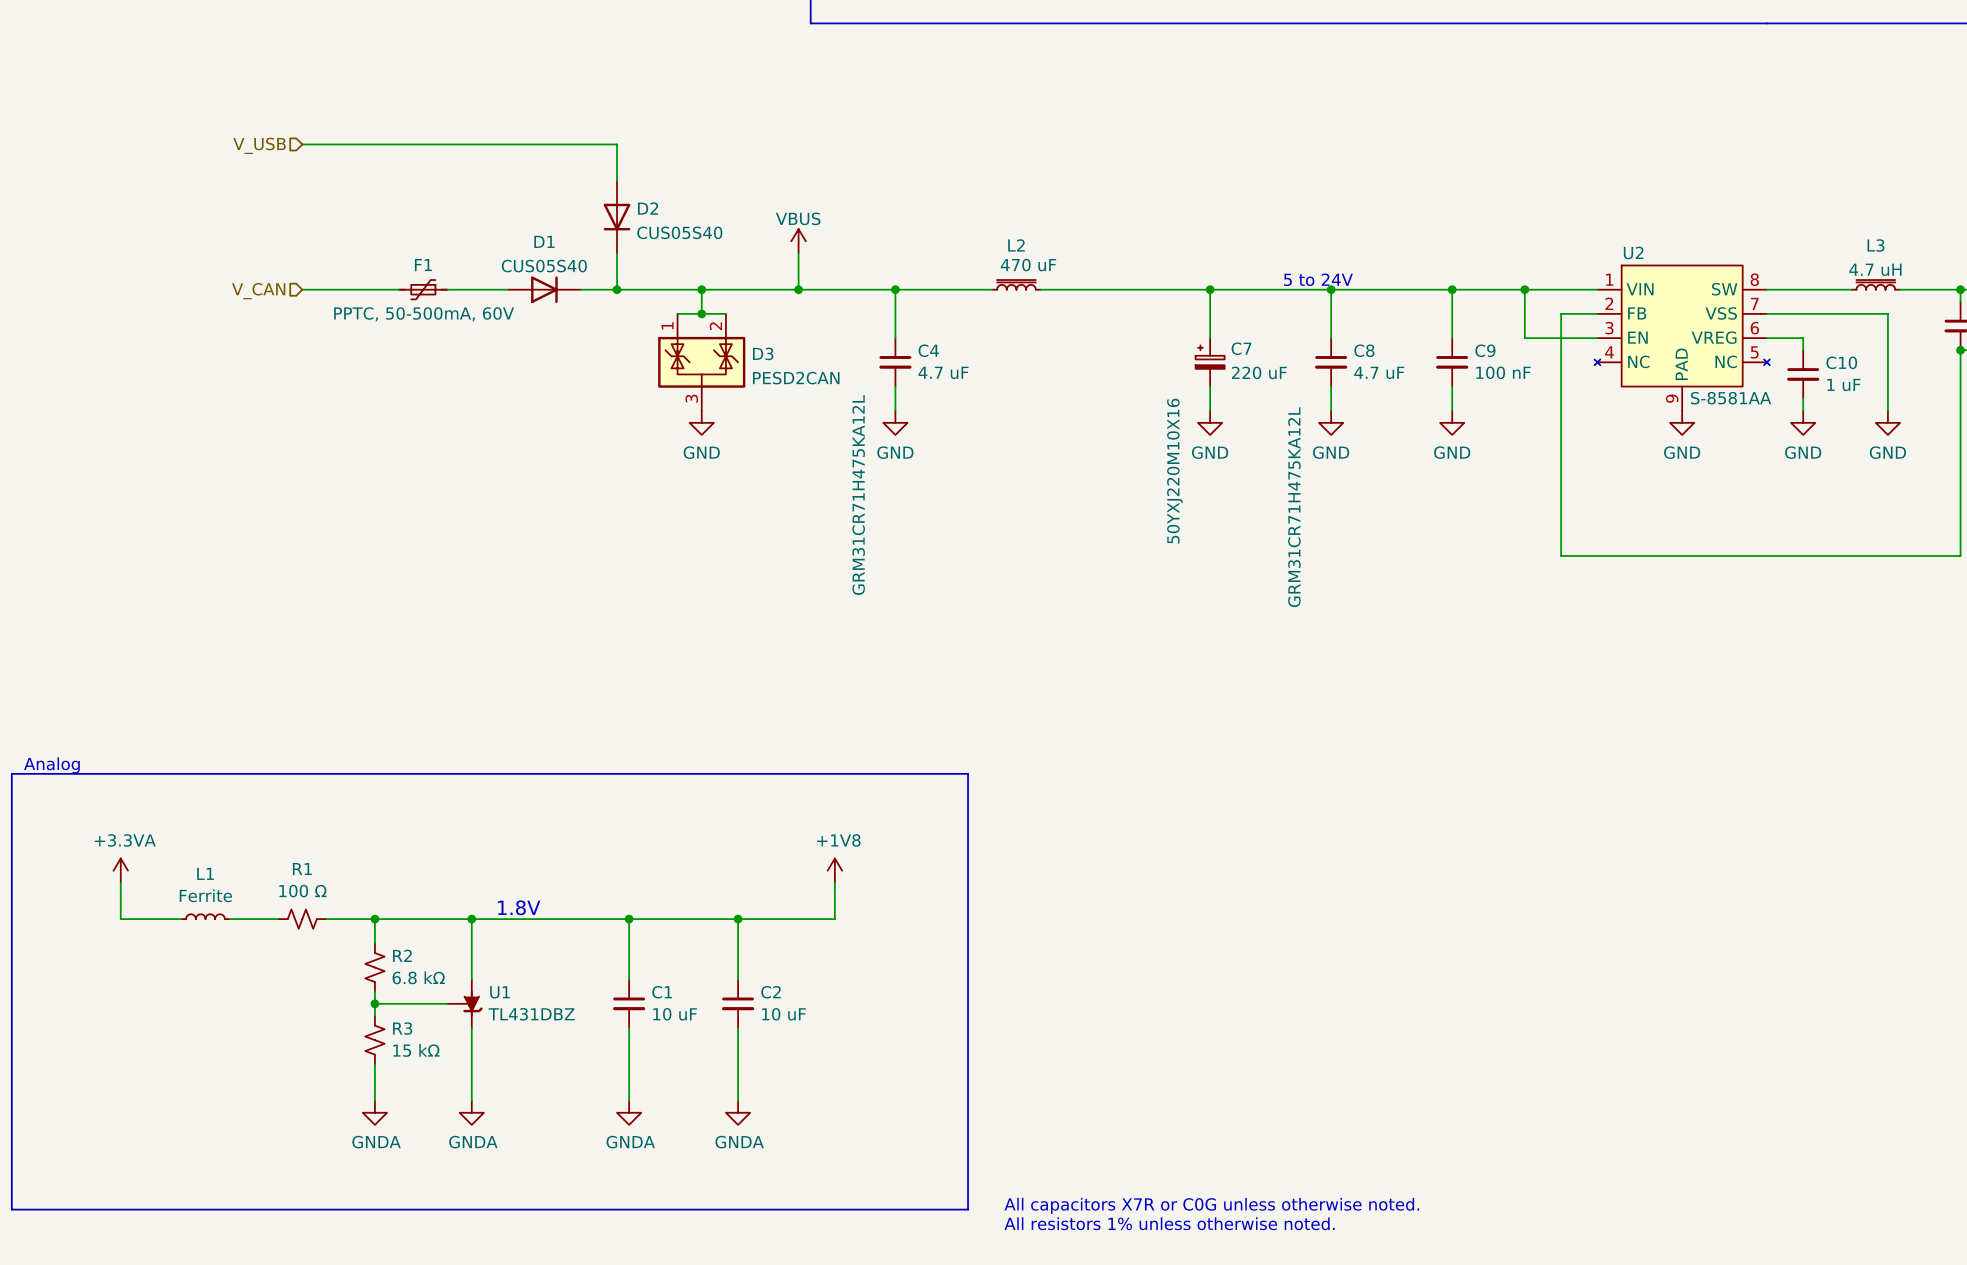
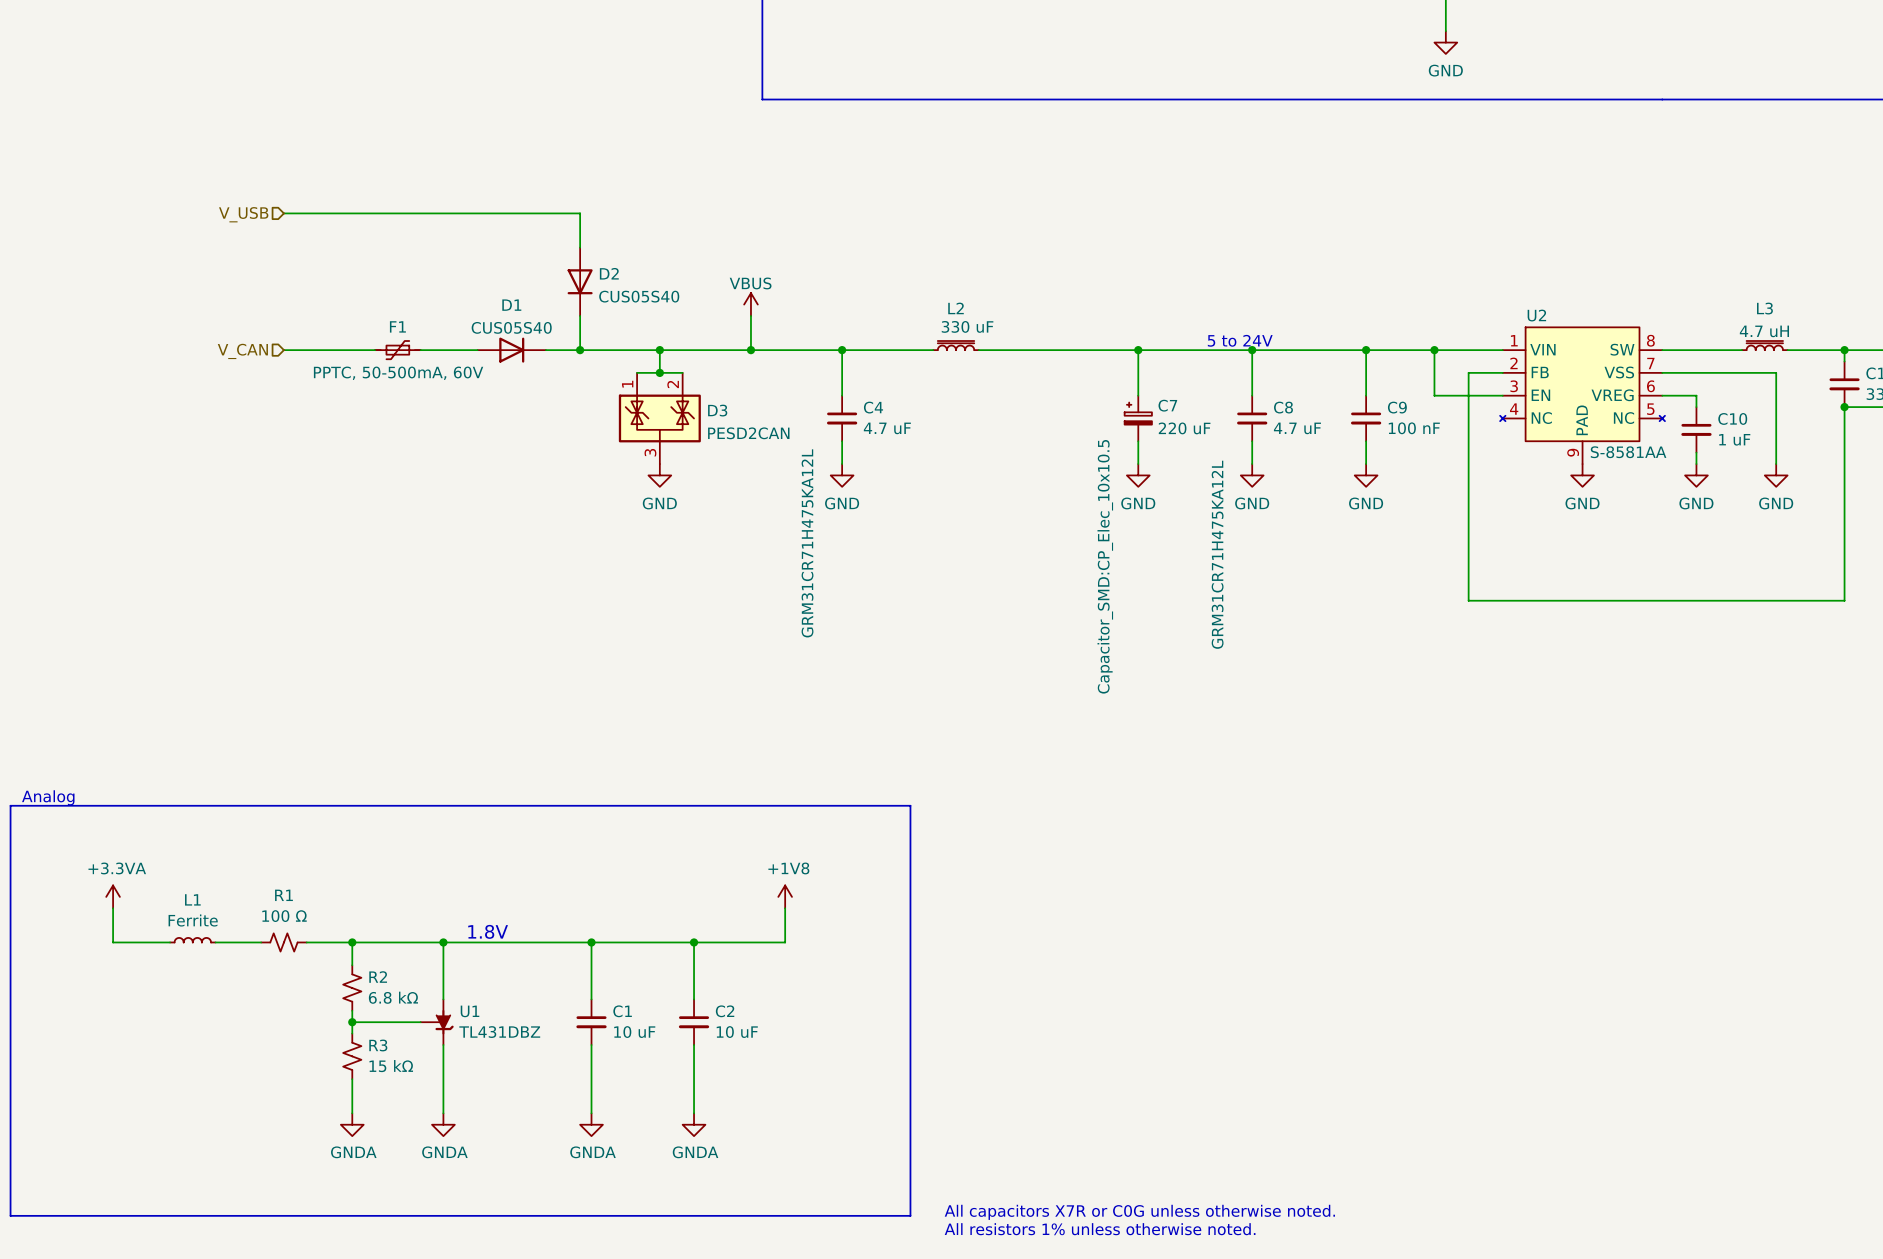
L2 value: 470 uF (1028, 265) -> 330 uF (967, 326)
C7 text: 50YXJ220M10X16 (1174, 471) -> none
C7 text: none -> Capacitor_SMD:CP_Elec_10x10.5 (1105, 566)

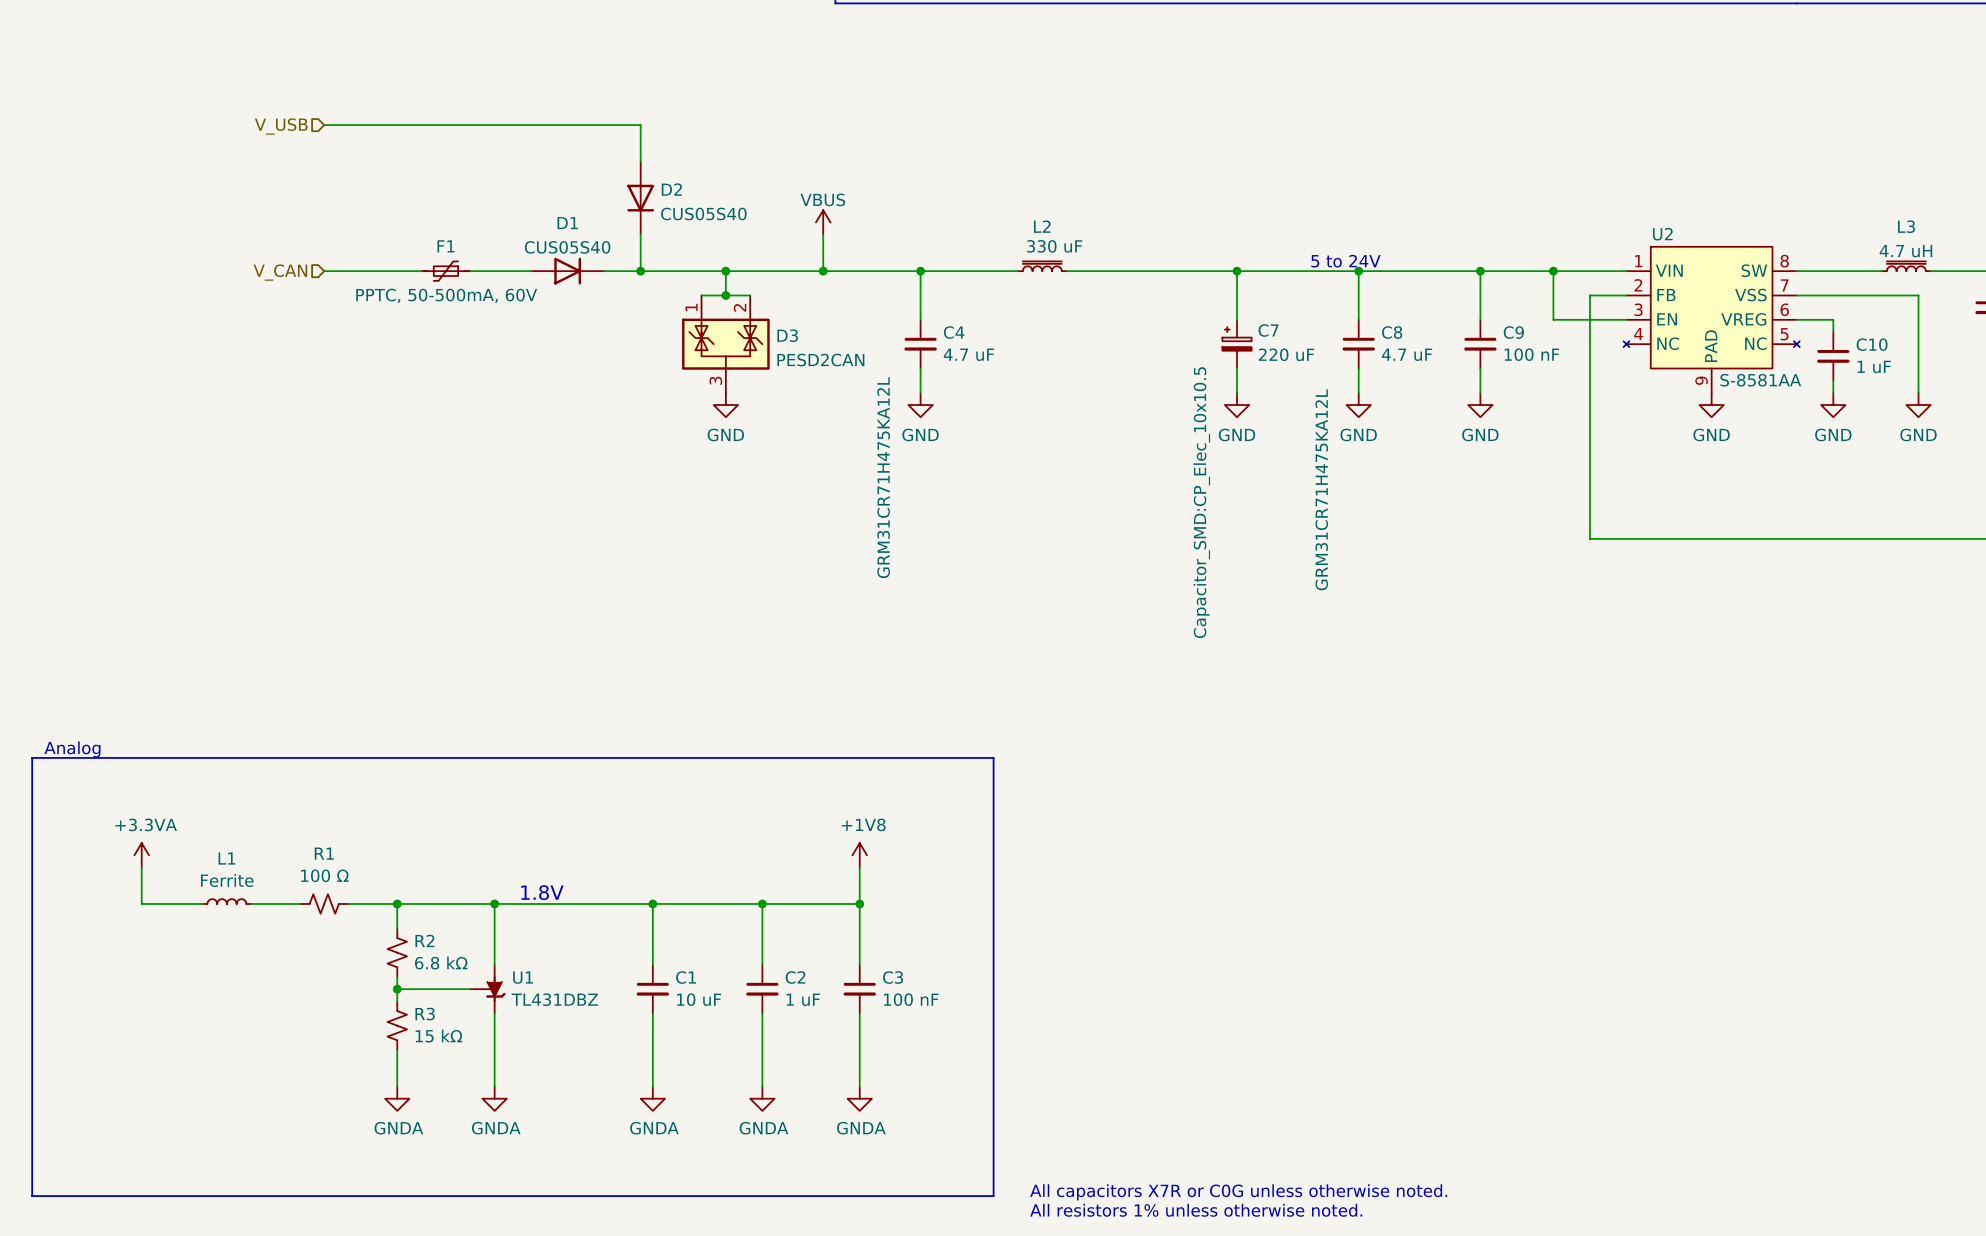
wire: none -> (859, 903) (859, 964)
junction: none -> (859, 903)
C3: none -> 100 nF (859, 989)
C2 value: 10 uF (737, 1032) -> 1 uF (803, 999)
wire: none -> (859, 1013) (859, 1086)
power symbol: none -> GNDA (859, 1098)

